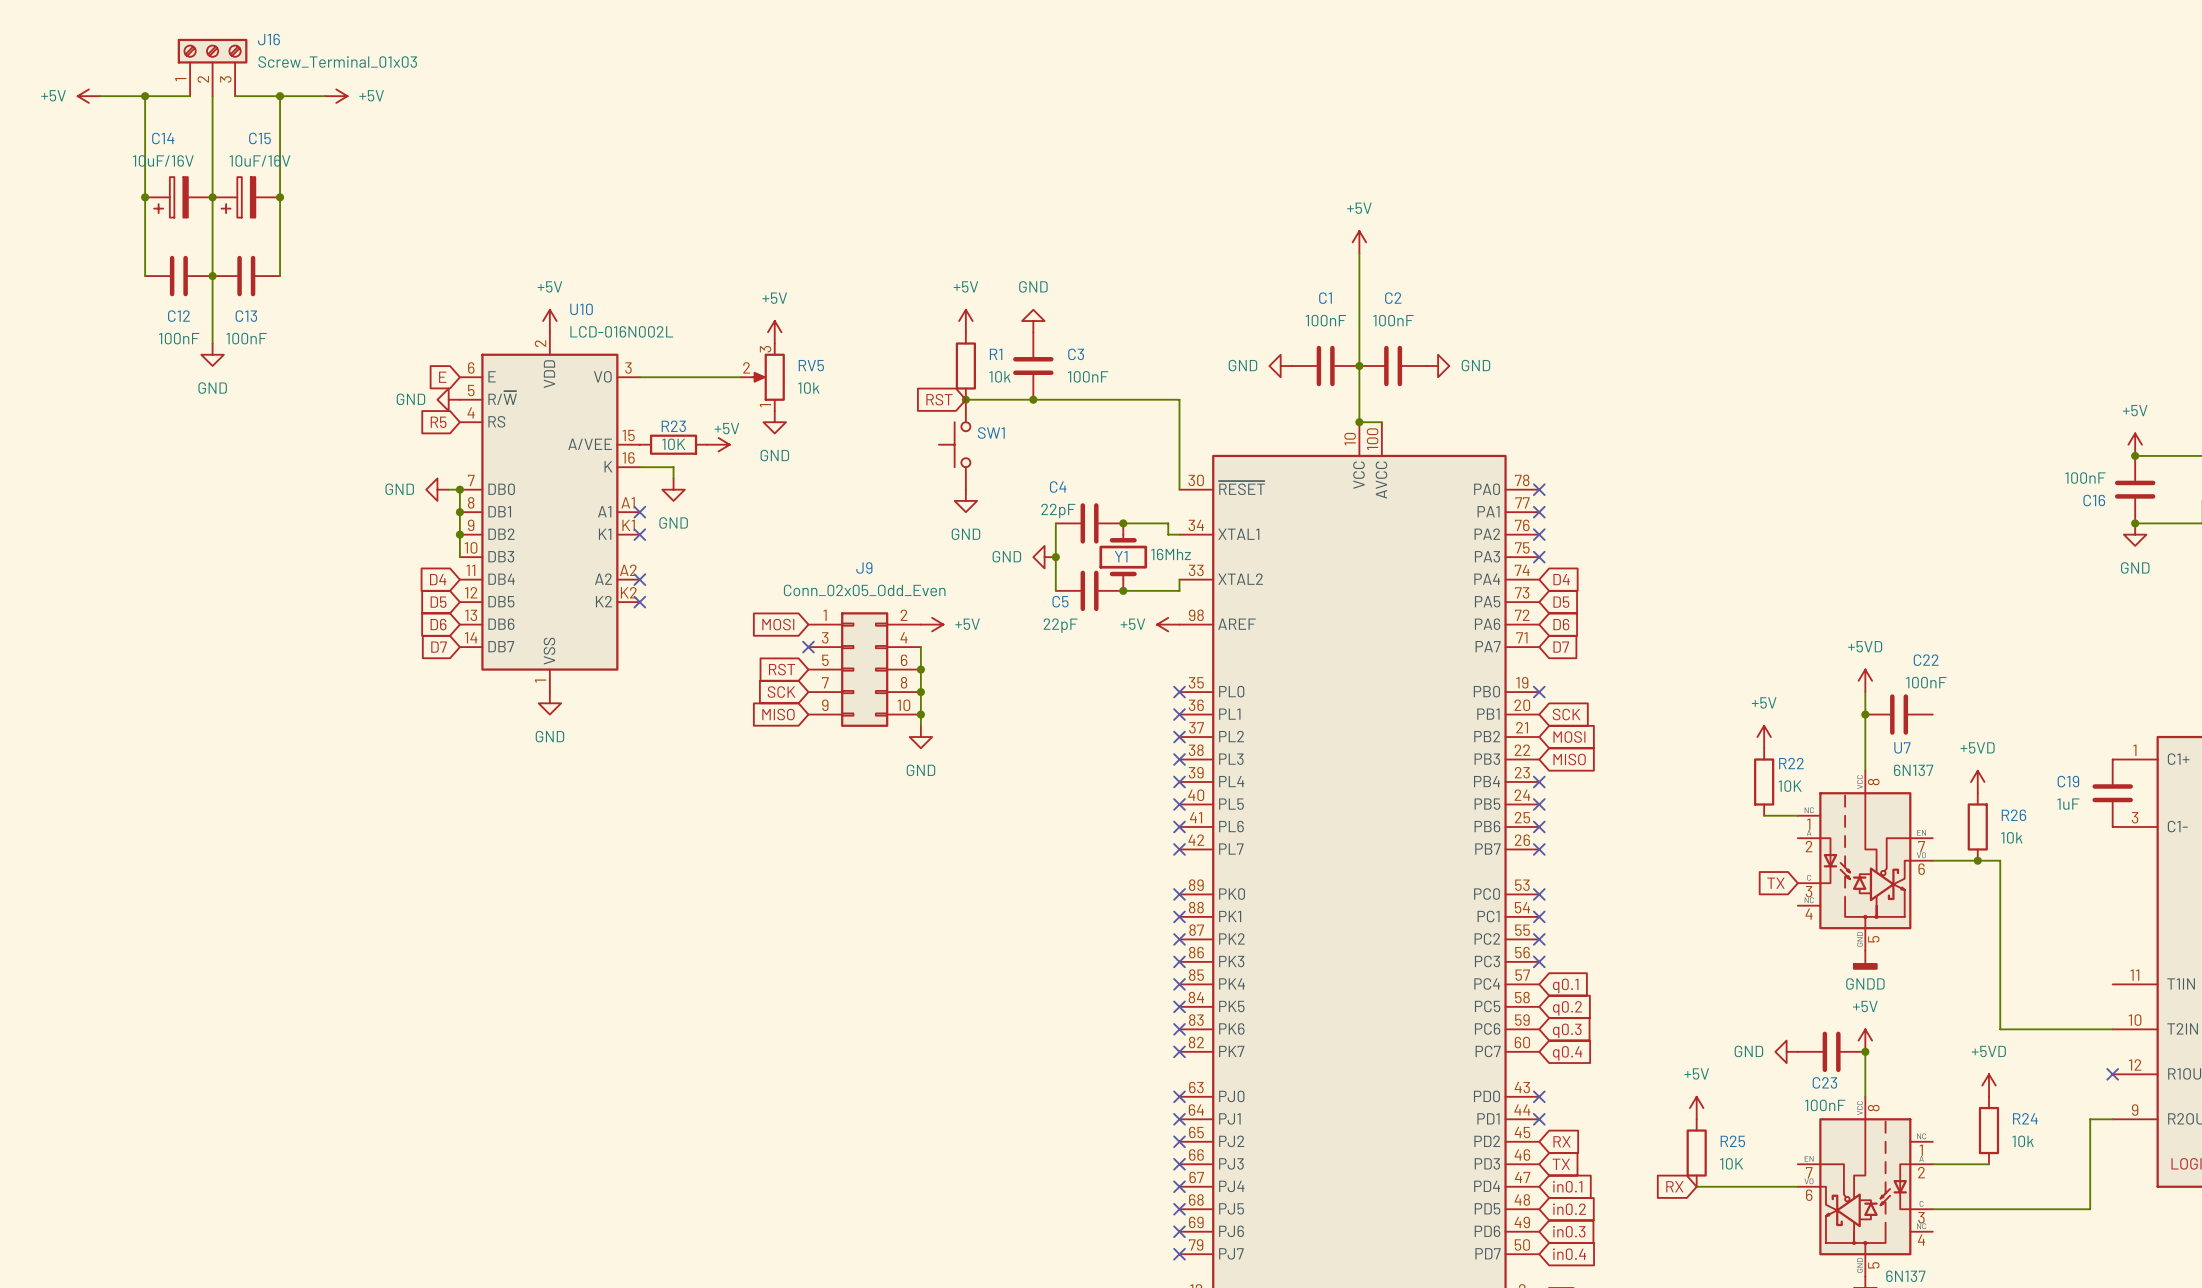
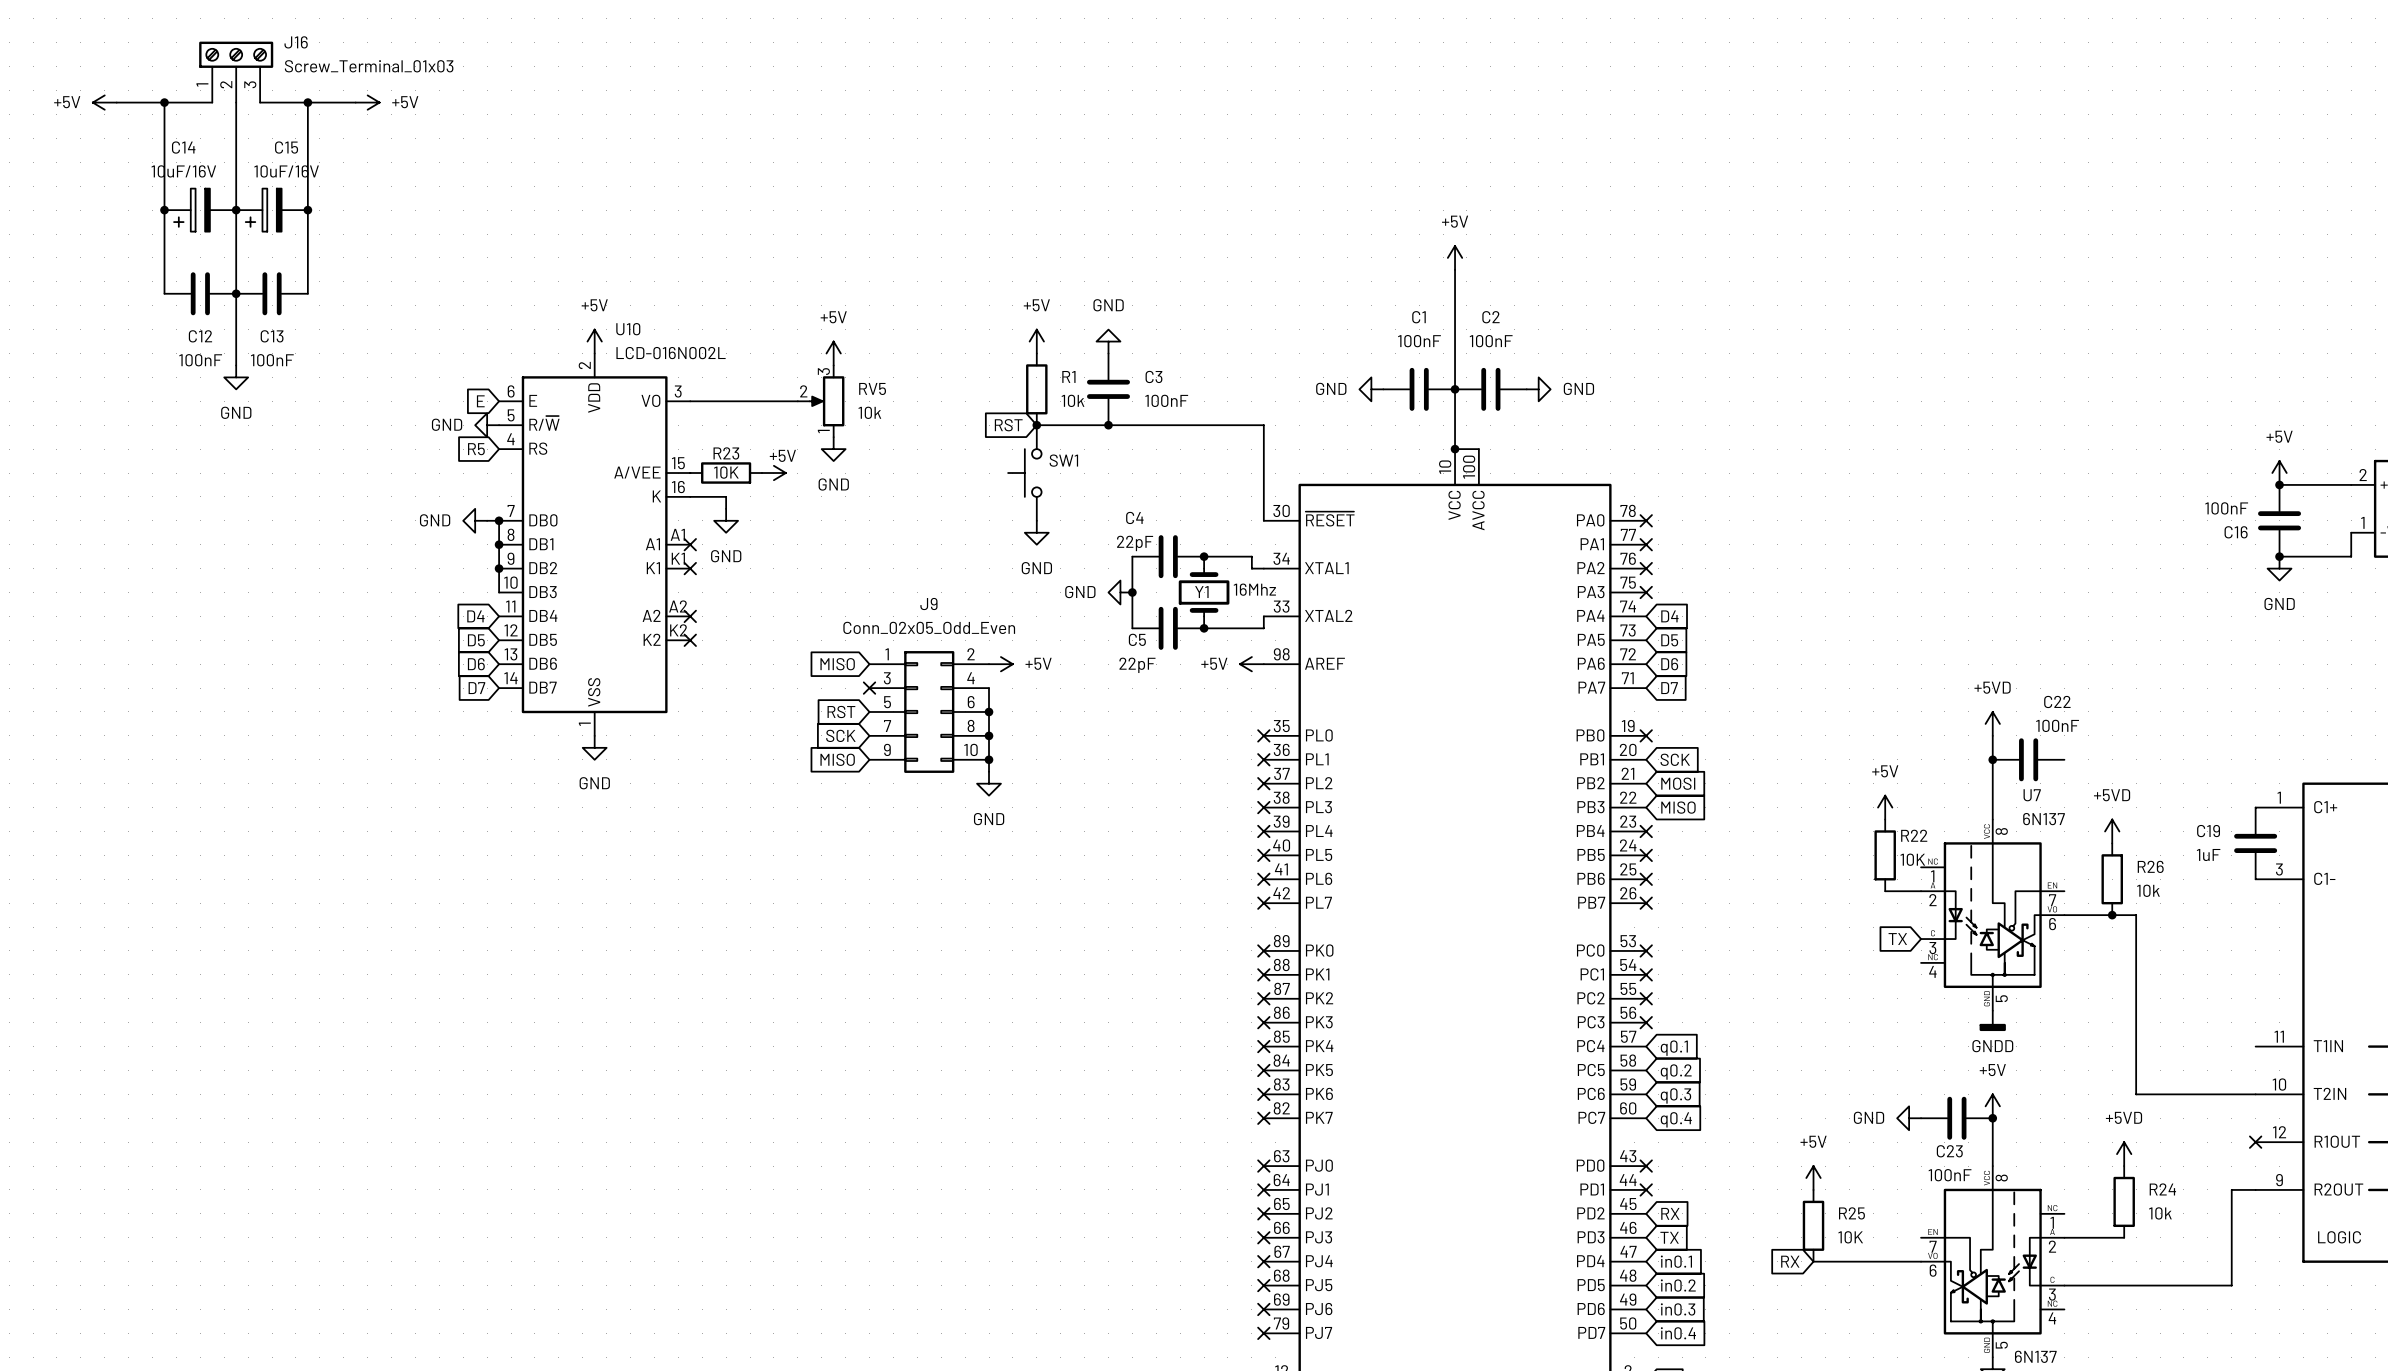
global label: MOSI (778, 624) -> MISO (837, 664)
power symbol position: +5V (1764, 737) -> +5V (1885, 807)
R22 position: (1764, 782) -> (1885, 855)
wire: (1764, 815) (1797, 815) -> (1885, 891) (1921, 891)

